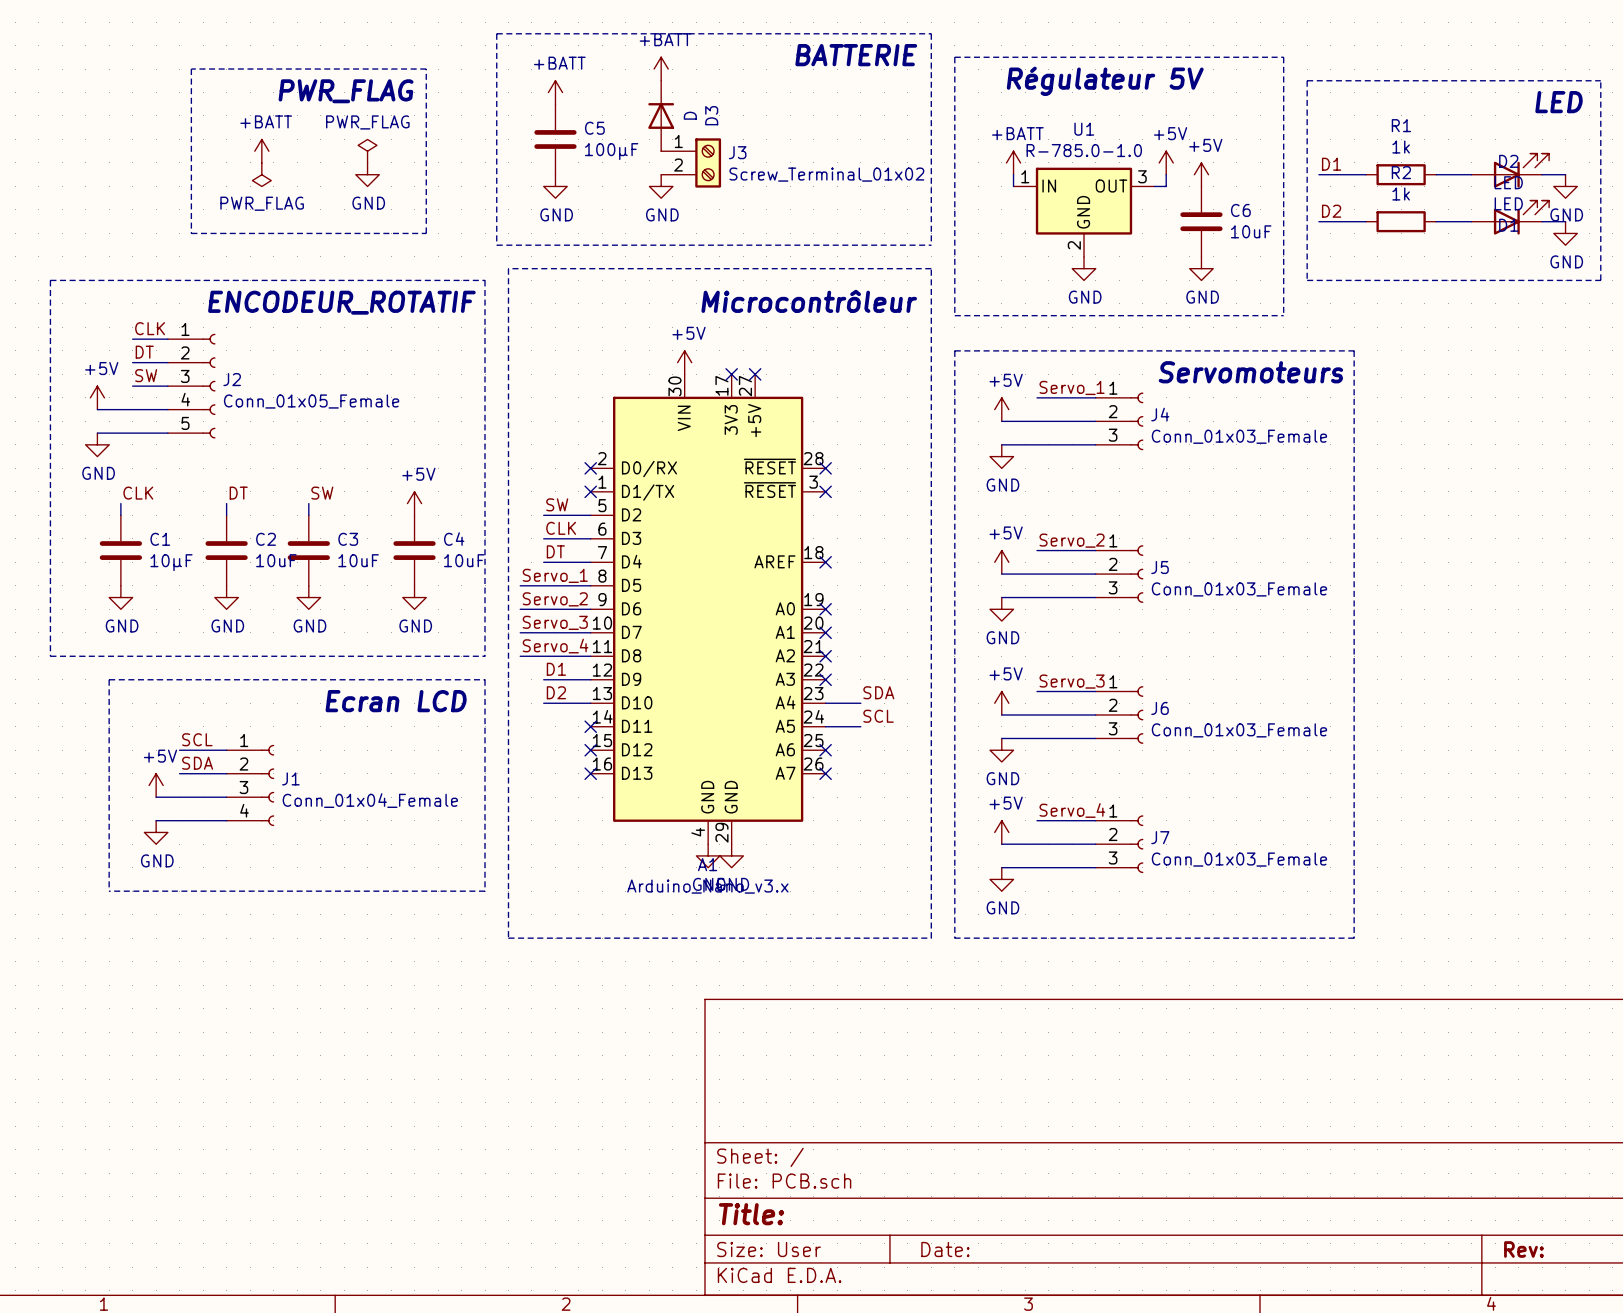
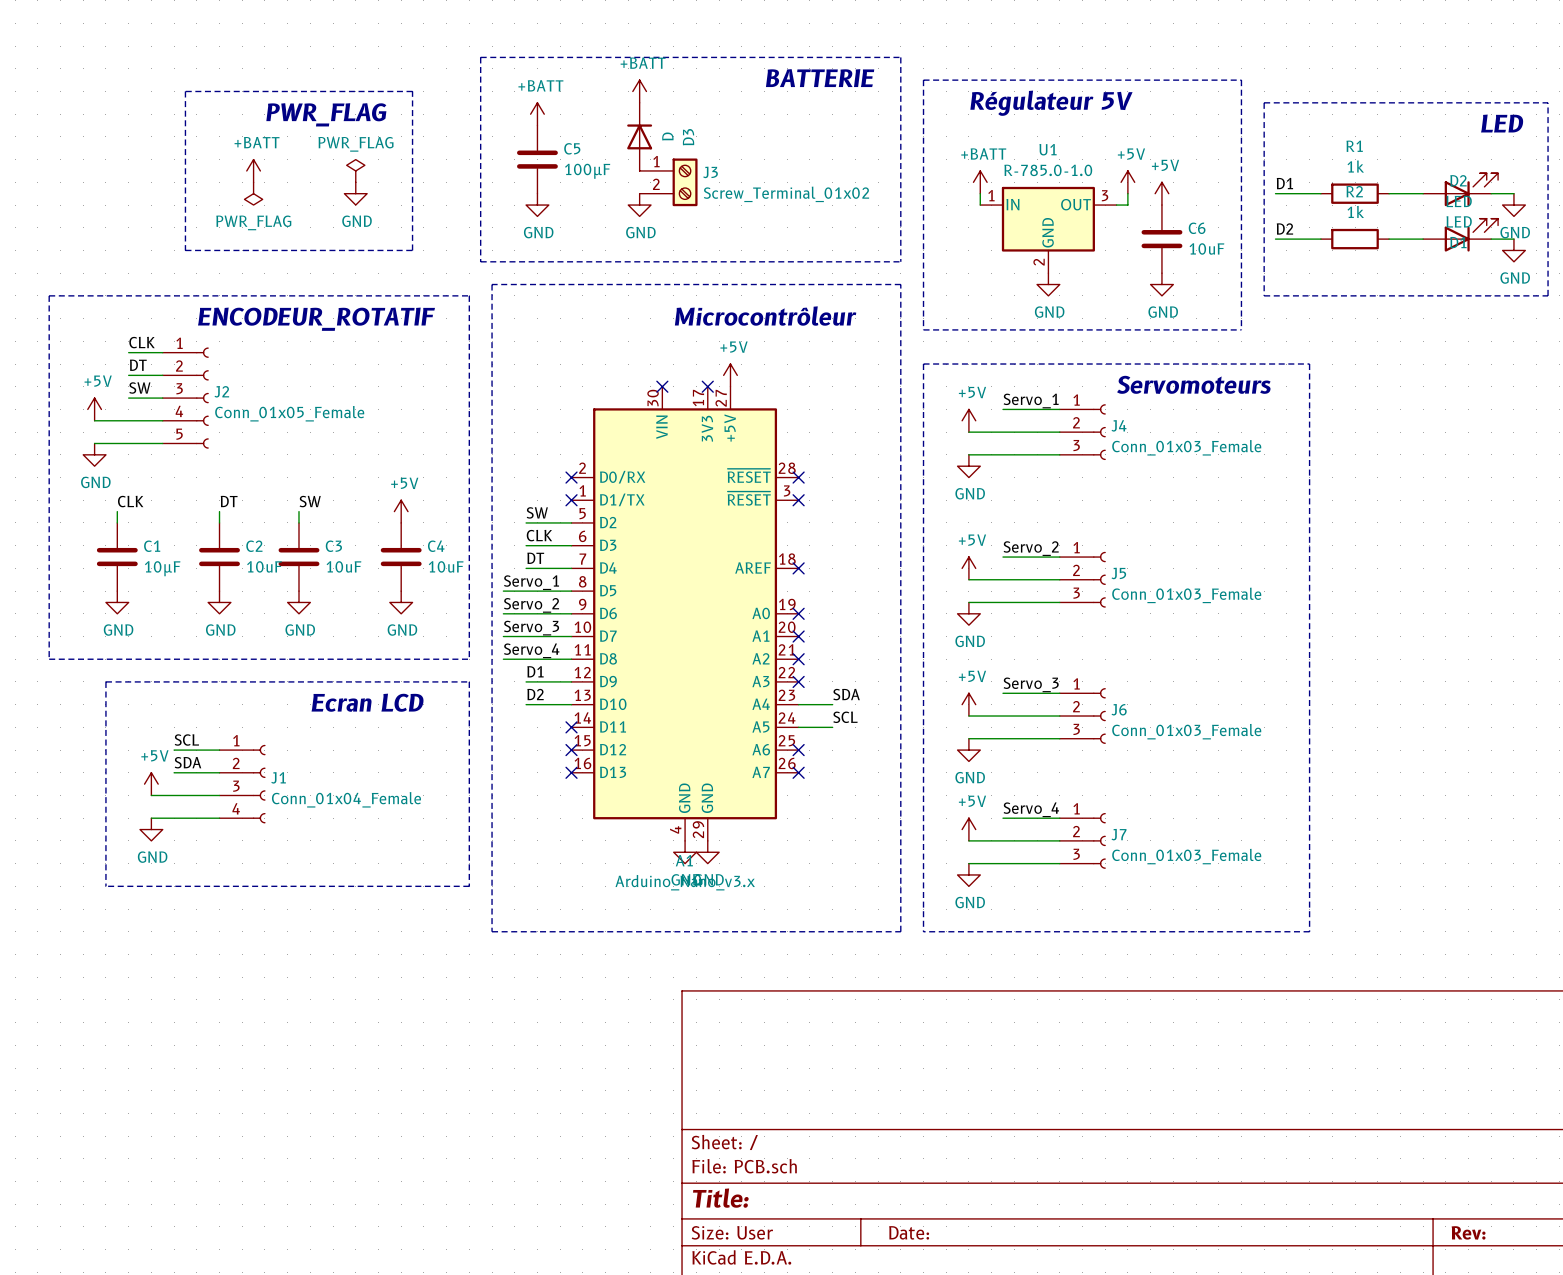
power symbol position: +5V (684, 362) -> +5V (730, 375)
no-connect mark: none -> (662, 386)
no-connect mark: (755, 374) -> none

